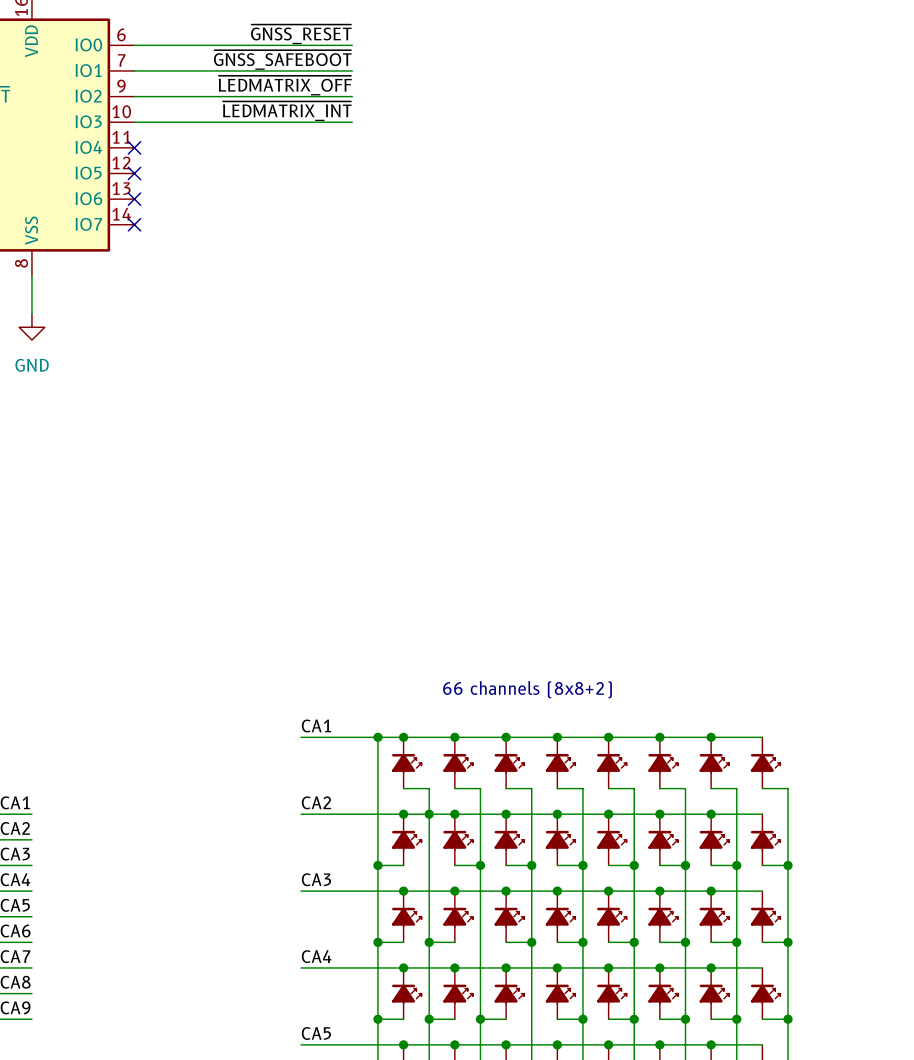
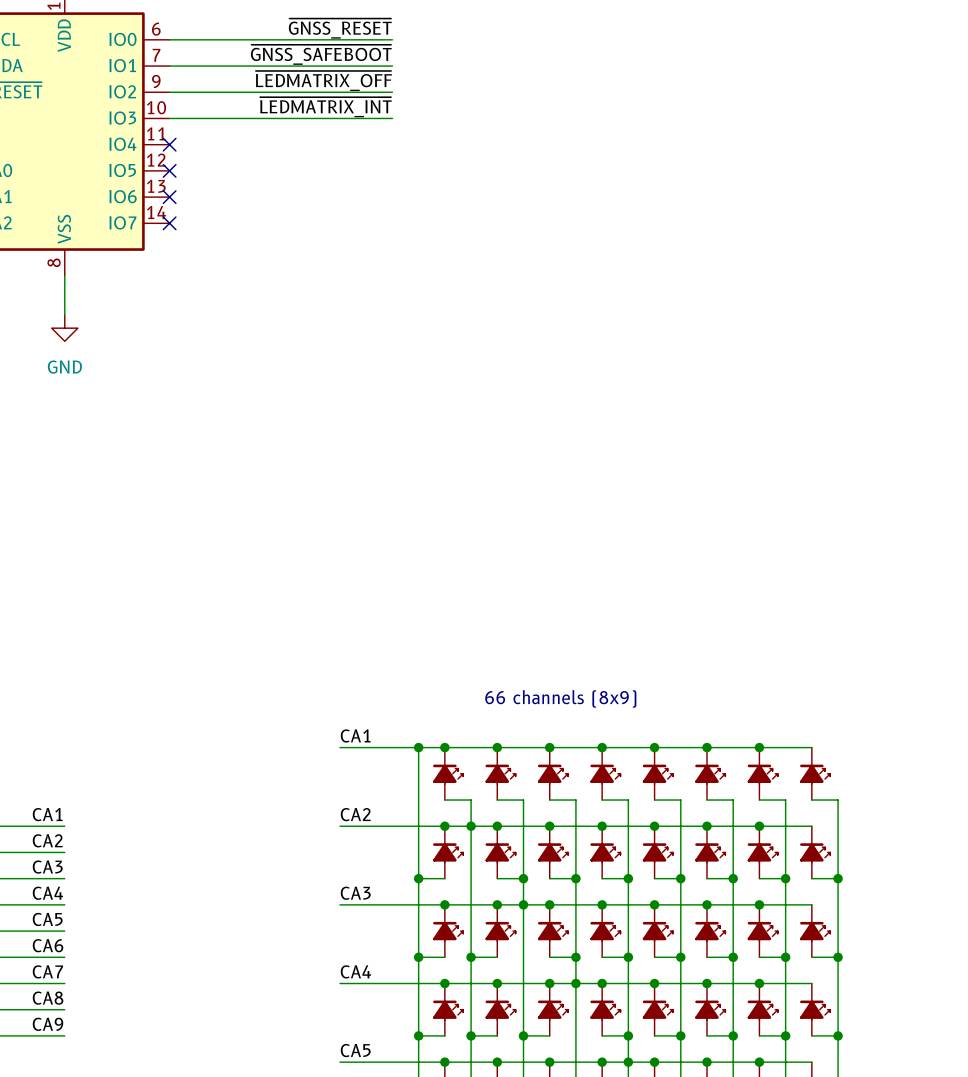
text: 66 channels (8x8+2) (527, 689) -> 66 channels (8x9) (560, 698)
junction: none -> (523, 904)
junction: none -> (575, 983)
junction: none -> (628, 1062)

